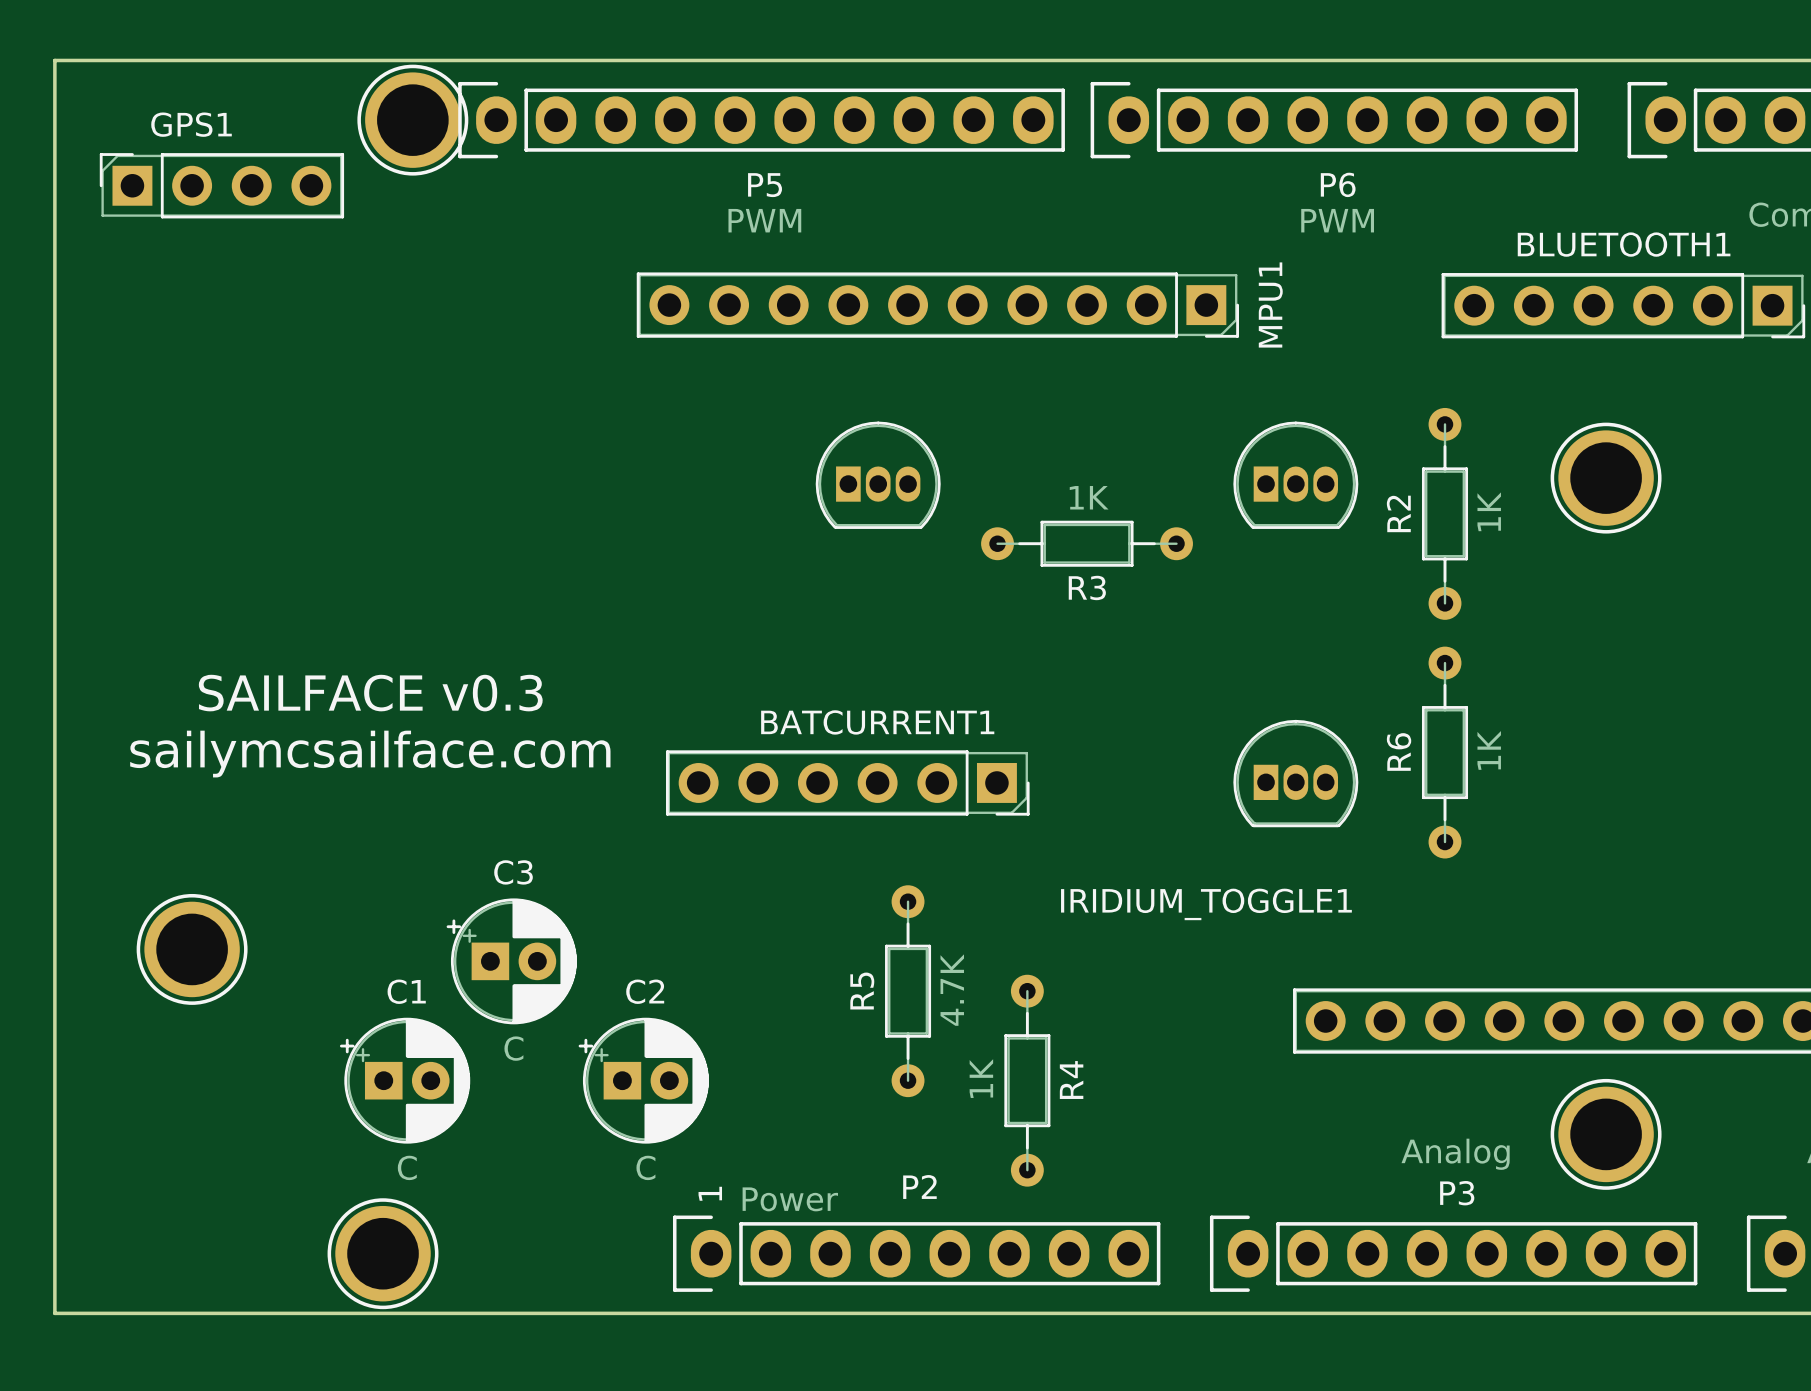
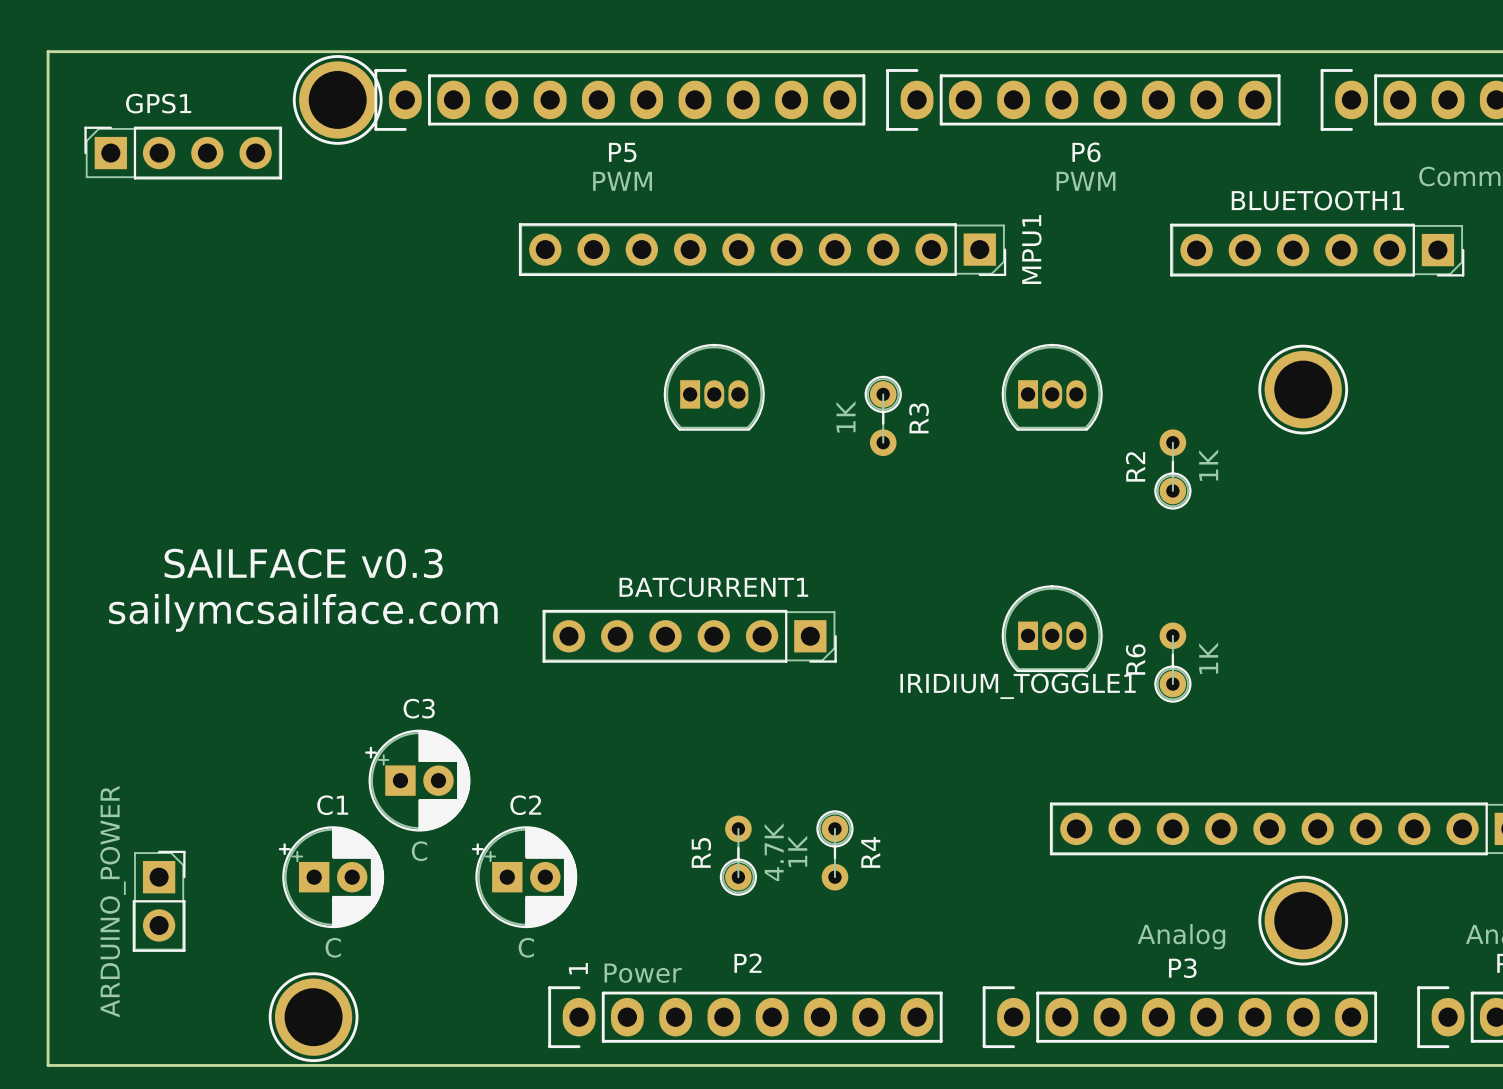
R2 footprint: [1421, 407, 1469, 620] -> [1154, 429, 1192, 510]
R3 value position: 1K (1089, 497) -> 1K (846, 416)
R3 footprint: [981, 520, 1193, 567] -> [864, 375, 902, 457]
R3 name position: R3 (1087, 587) -> R3 (919, 418)
R6 footprint: [1421, 646, 1469, 859] -> [1154, 622, 1192, 703]
R5 footprint: [885, 885, 932, 1098] -> [719, 815, 758, 896]
IRIDIUM_TOGGLE1 name position: IRIDIUM_TOGGLE1 (1206, 904) -> IRIDIUM_TOGGLE1 (1018, 686)
part: (192, 949) -> none
R4 footprint: [1004, 974, 1051, 1187] -> [816, 810, 854, 891]
part: none -> ARDUINO_POWER (159, 901)

